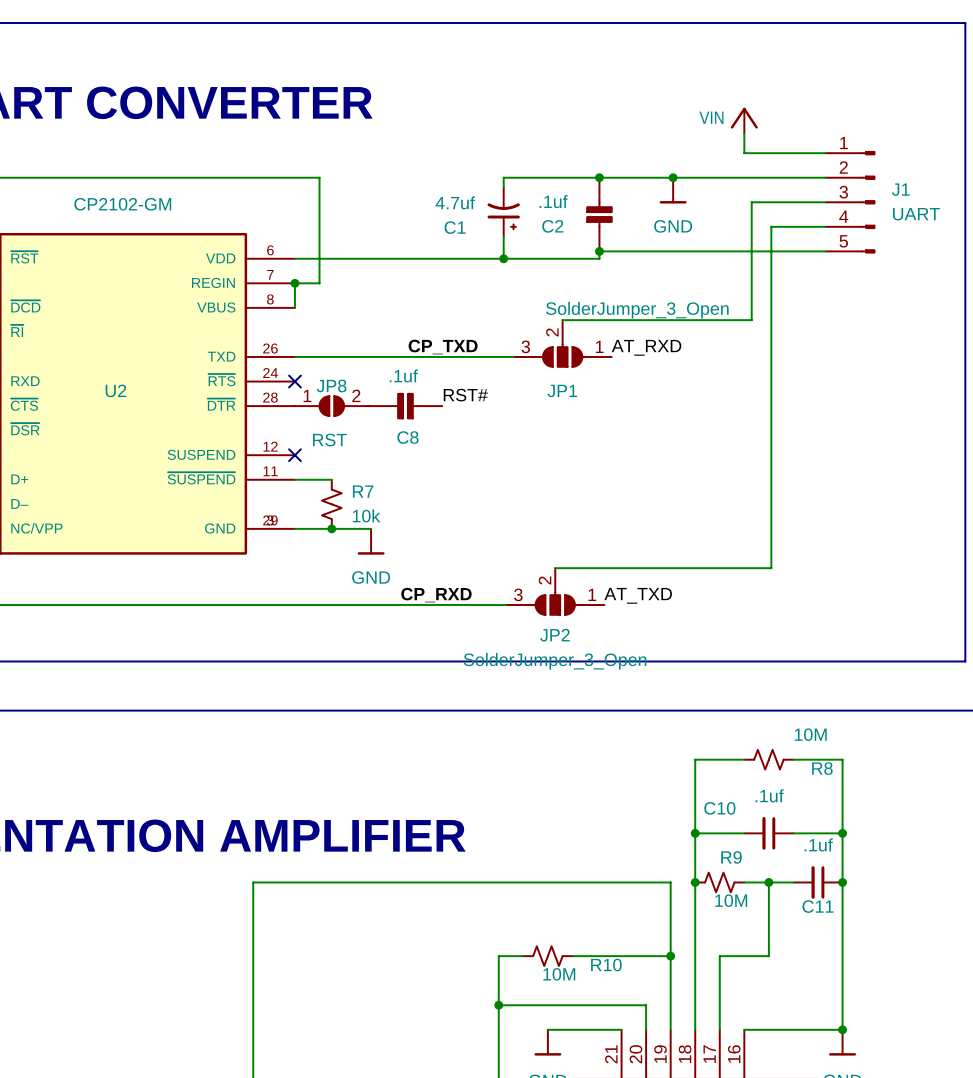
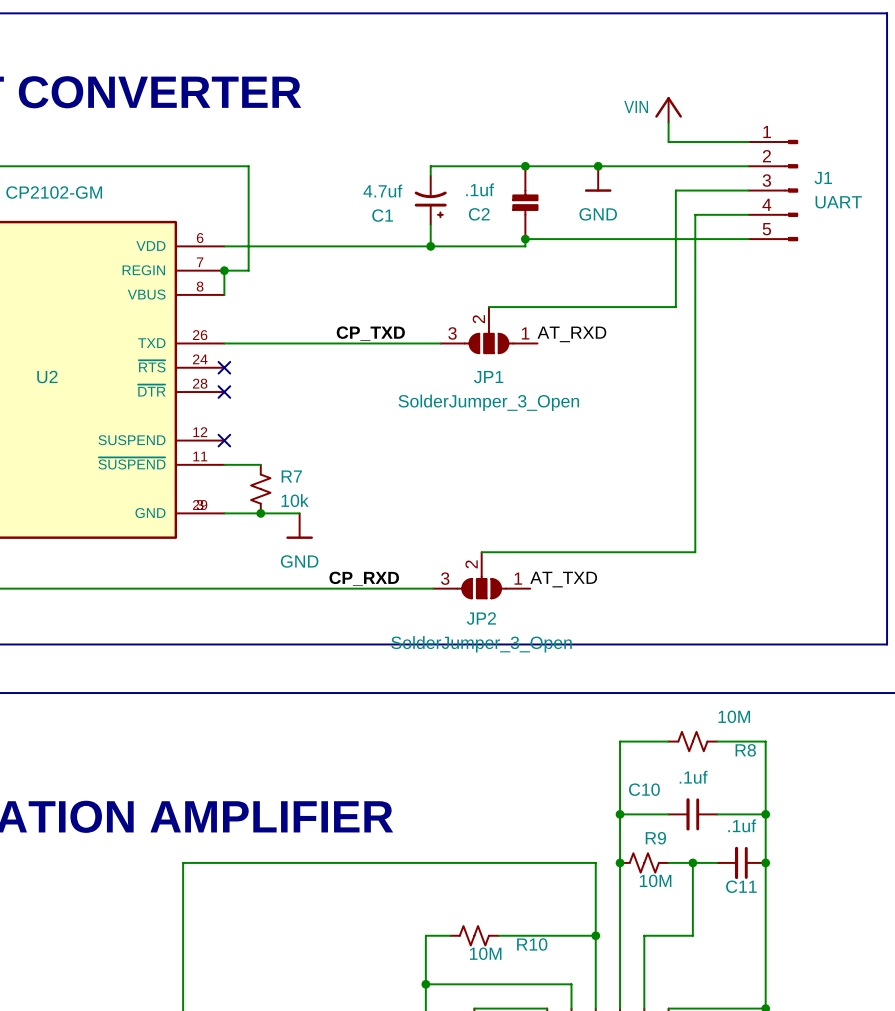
JP1 value position: SolderJumper_3_Open (637, 310) -> SolderJumper_3_Open (488, 402)
label: RST# (465, 395) -> none
no-connect mark: none -> (224, 392)
JP8: RST (331, 406) -> none
C8: .1uf (405, 406) -> none

